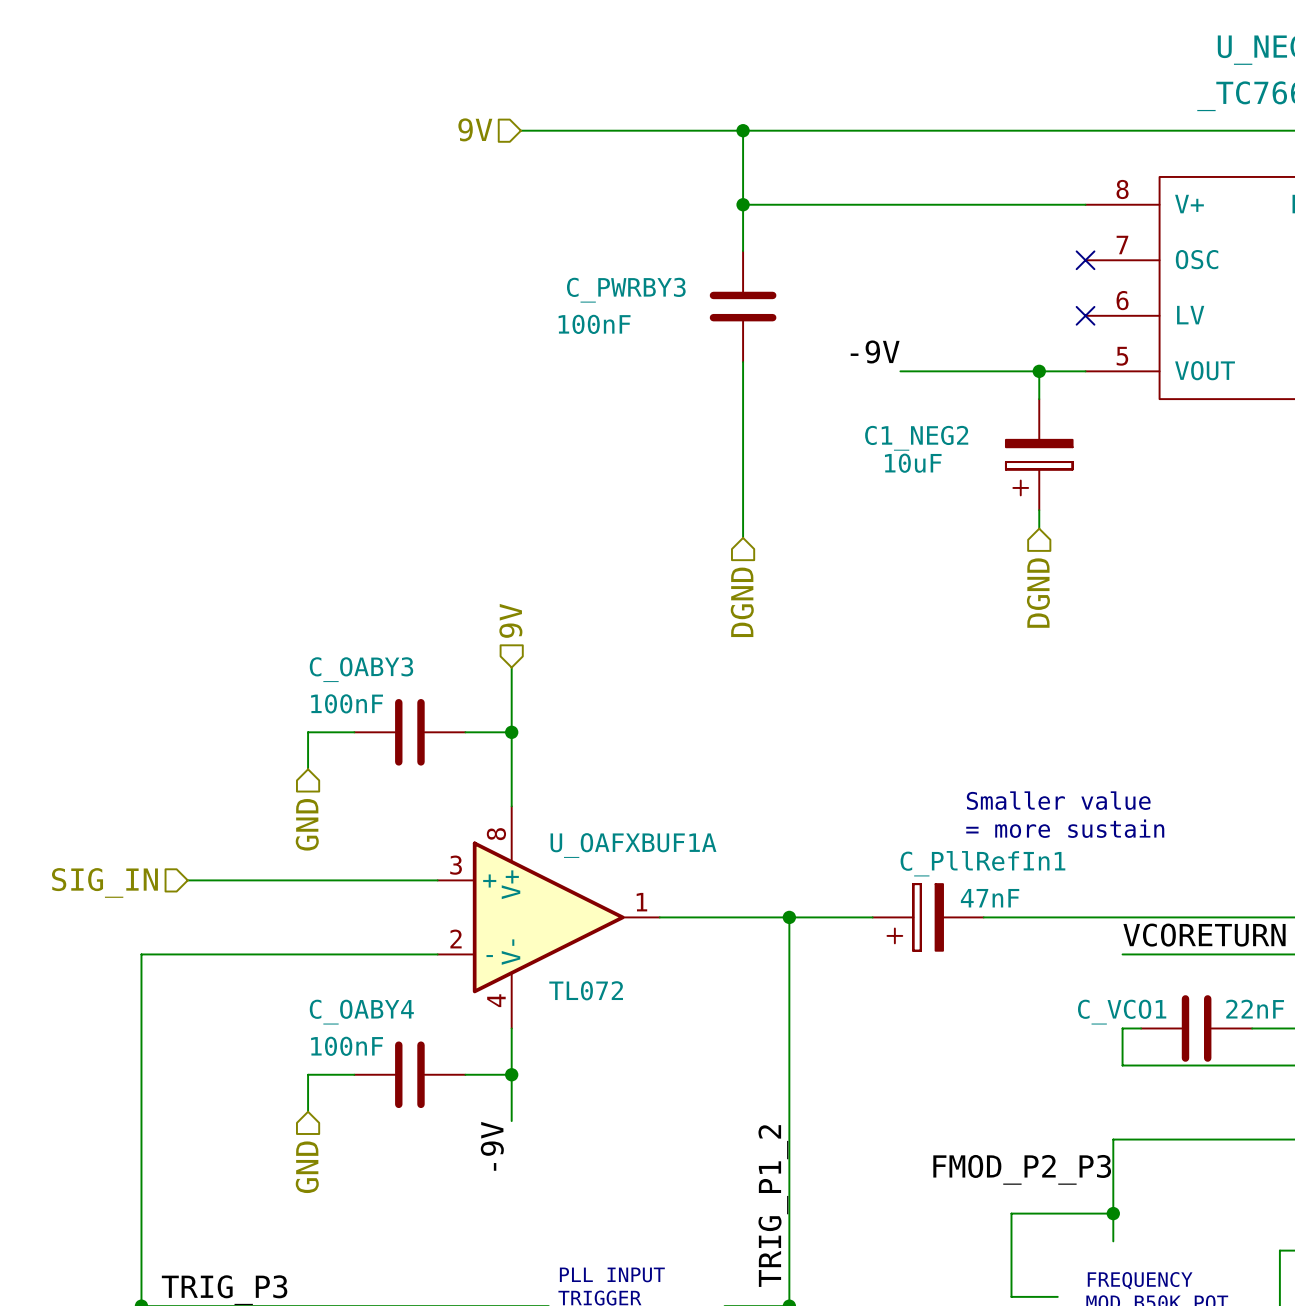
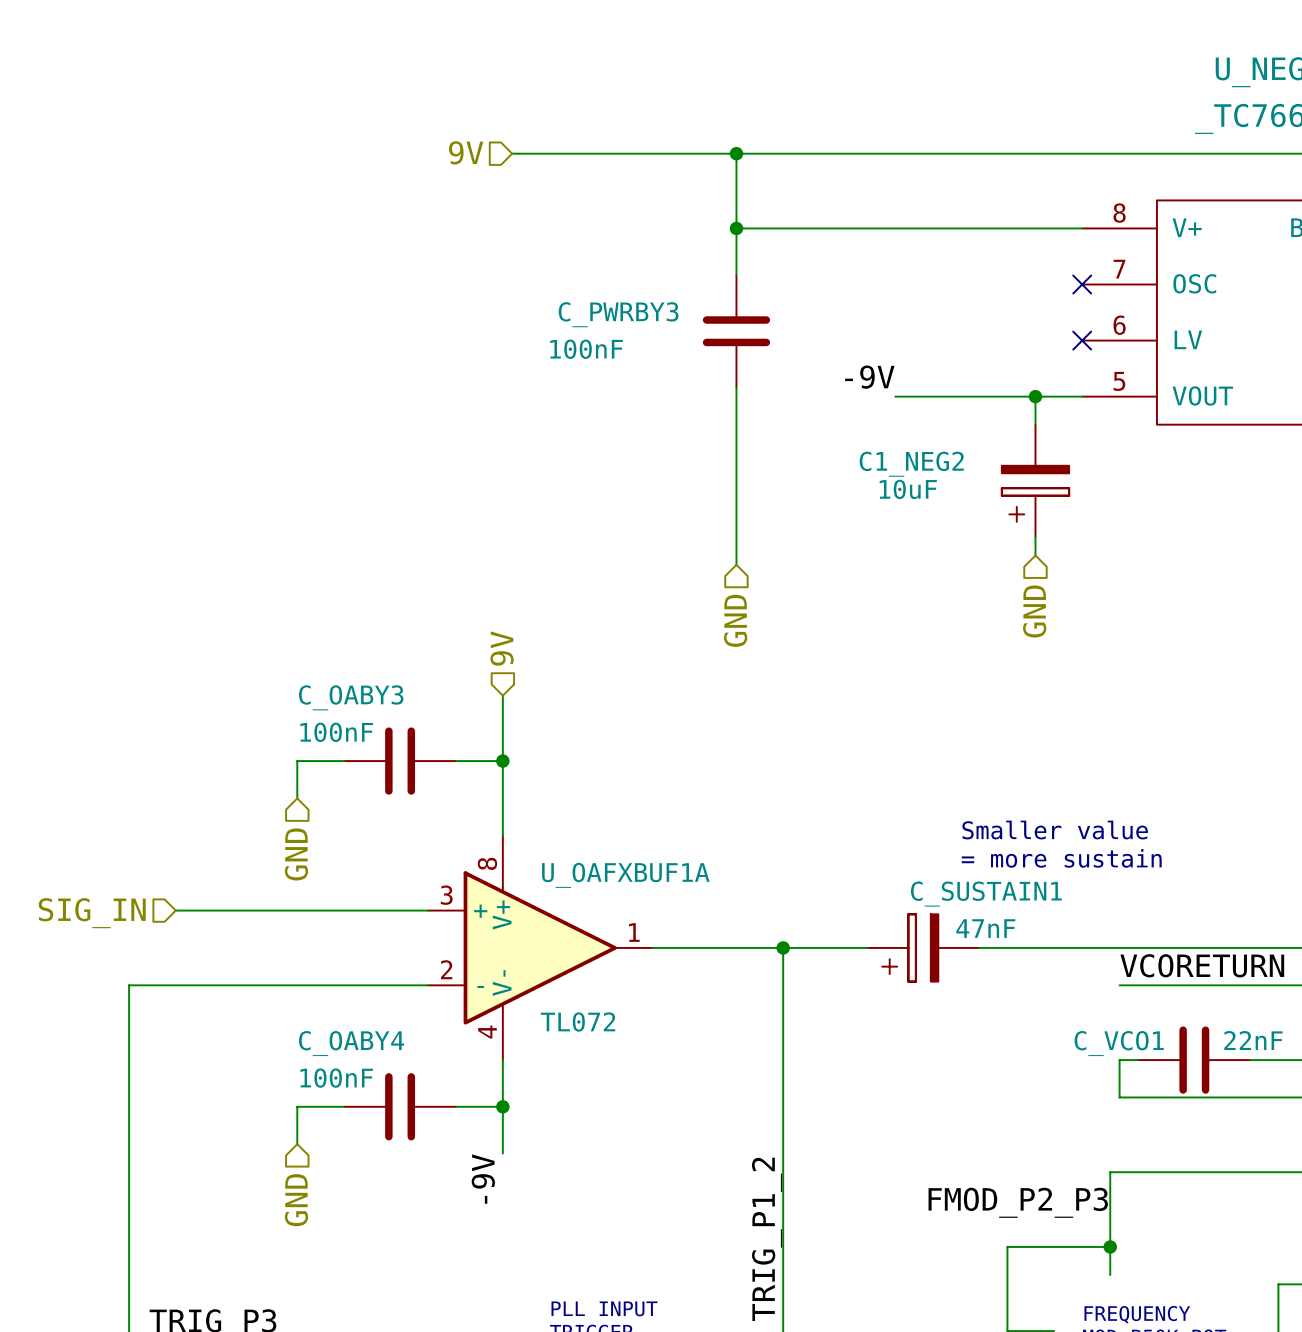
hierarchical label: DGND (1038, 593) -> GND (1034, 611)
hierarchical label: DGND (742, 602) -> GND (735, 620)
C_PllRefIn1 name: C_PllRefIn1 (982, 863) -> C_SUSTAIN1 (986, 894)

